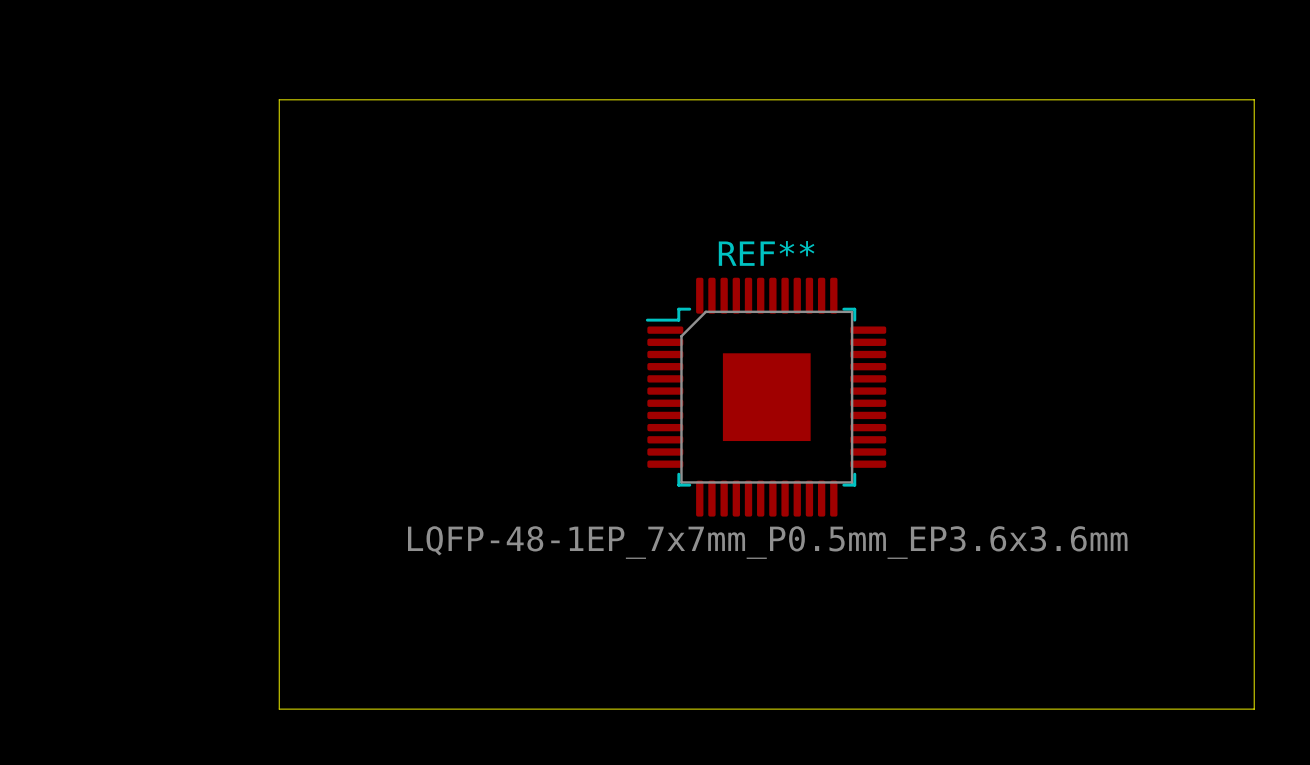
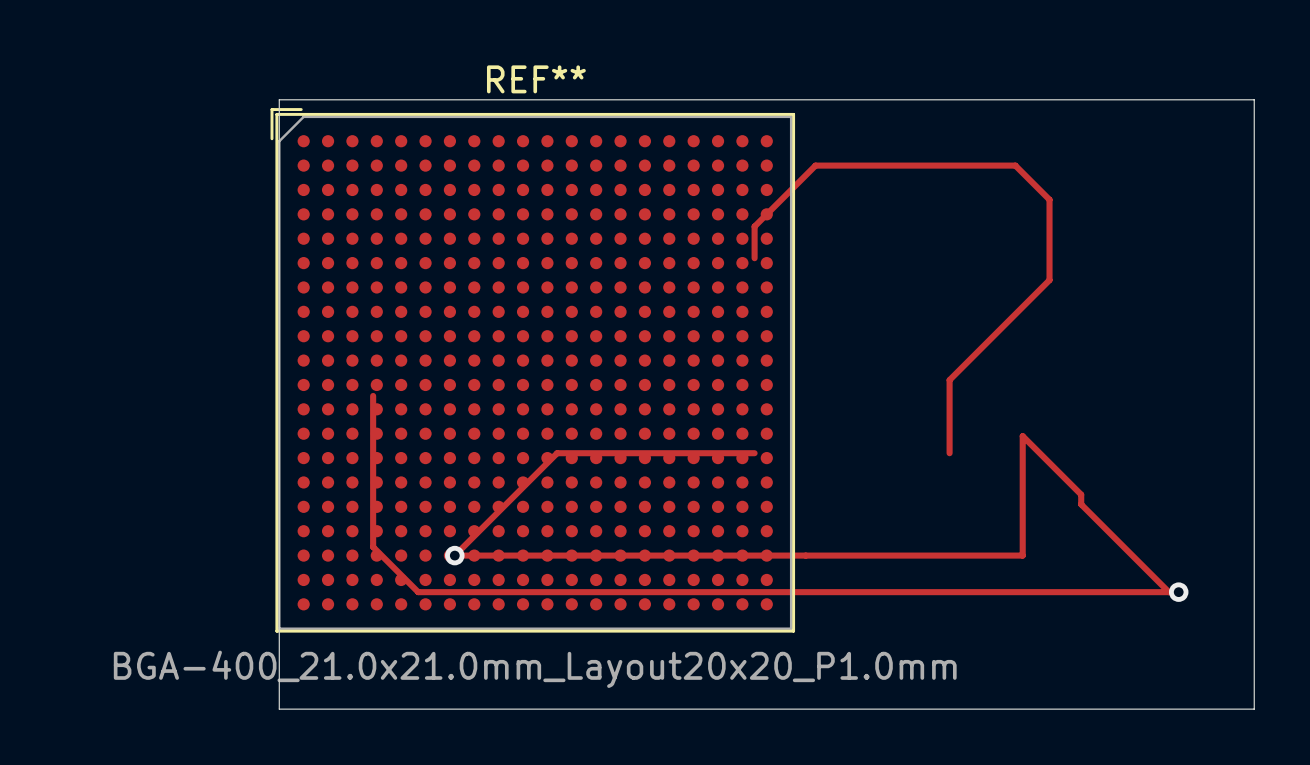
track: none -> (754, 258) (754, 226) (815, 165) (1015, 165) (1049, 199) (1049, 280) (949, 380) (949, 453)
REF**: none -> BGA-400_21.0x21.0mm_Layout20x20_P1.0mm (532, 370)
track: none -> (373, 395) (373, 547) (418, 592) (1178, 592)
REF**: LQFP-48-1EP_7x7mm_P0.5mm_EP3.6x3.6mm (766, 397) -> none
track: none -> (754, 453) (557, 453) (454, 555) (1022, 555) (1022, 436) (1081, 494) (1081, 504) (1168, 592)
via: none -> (454, 555)
via: none -> (1178, 592)

